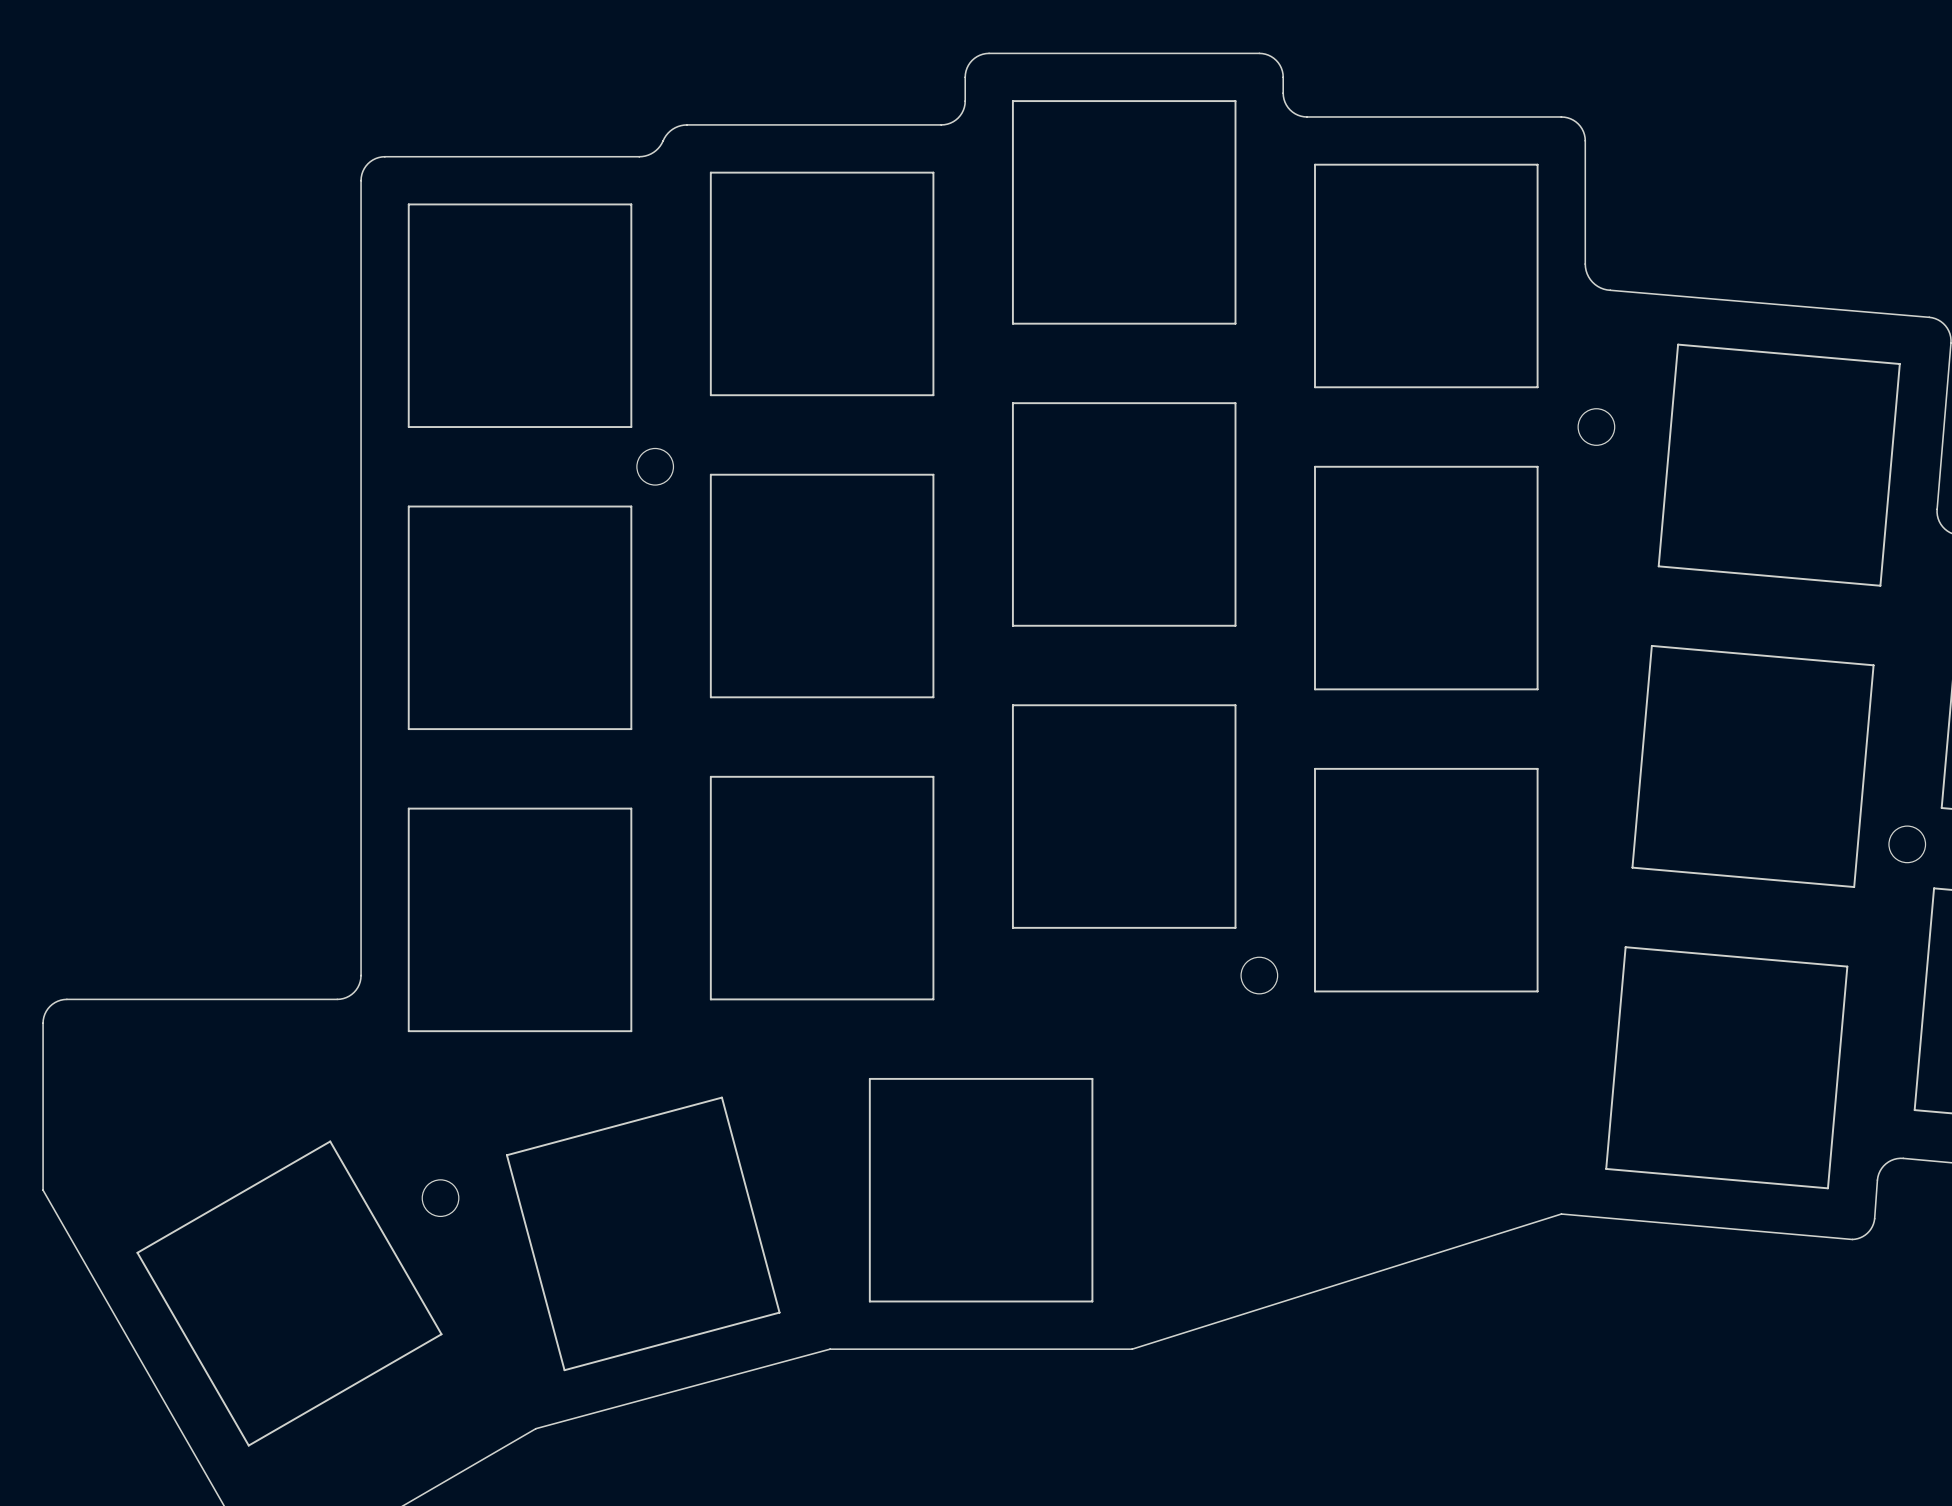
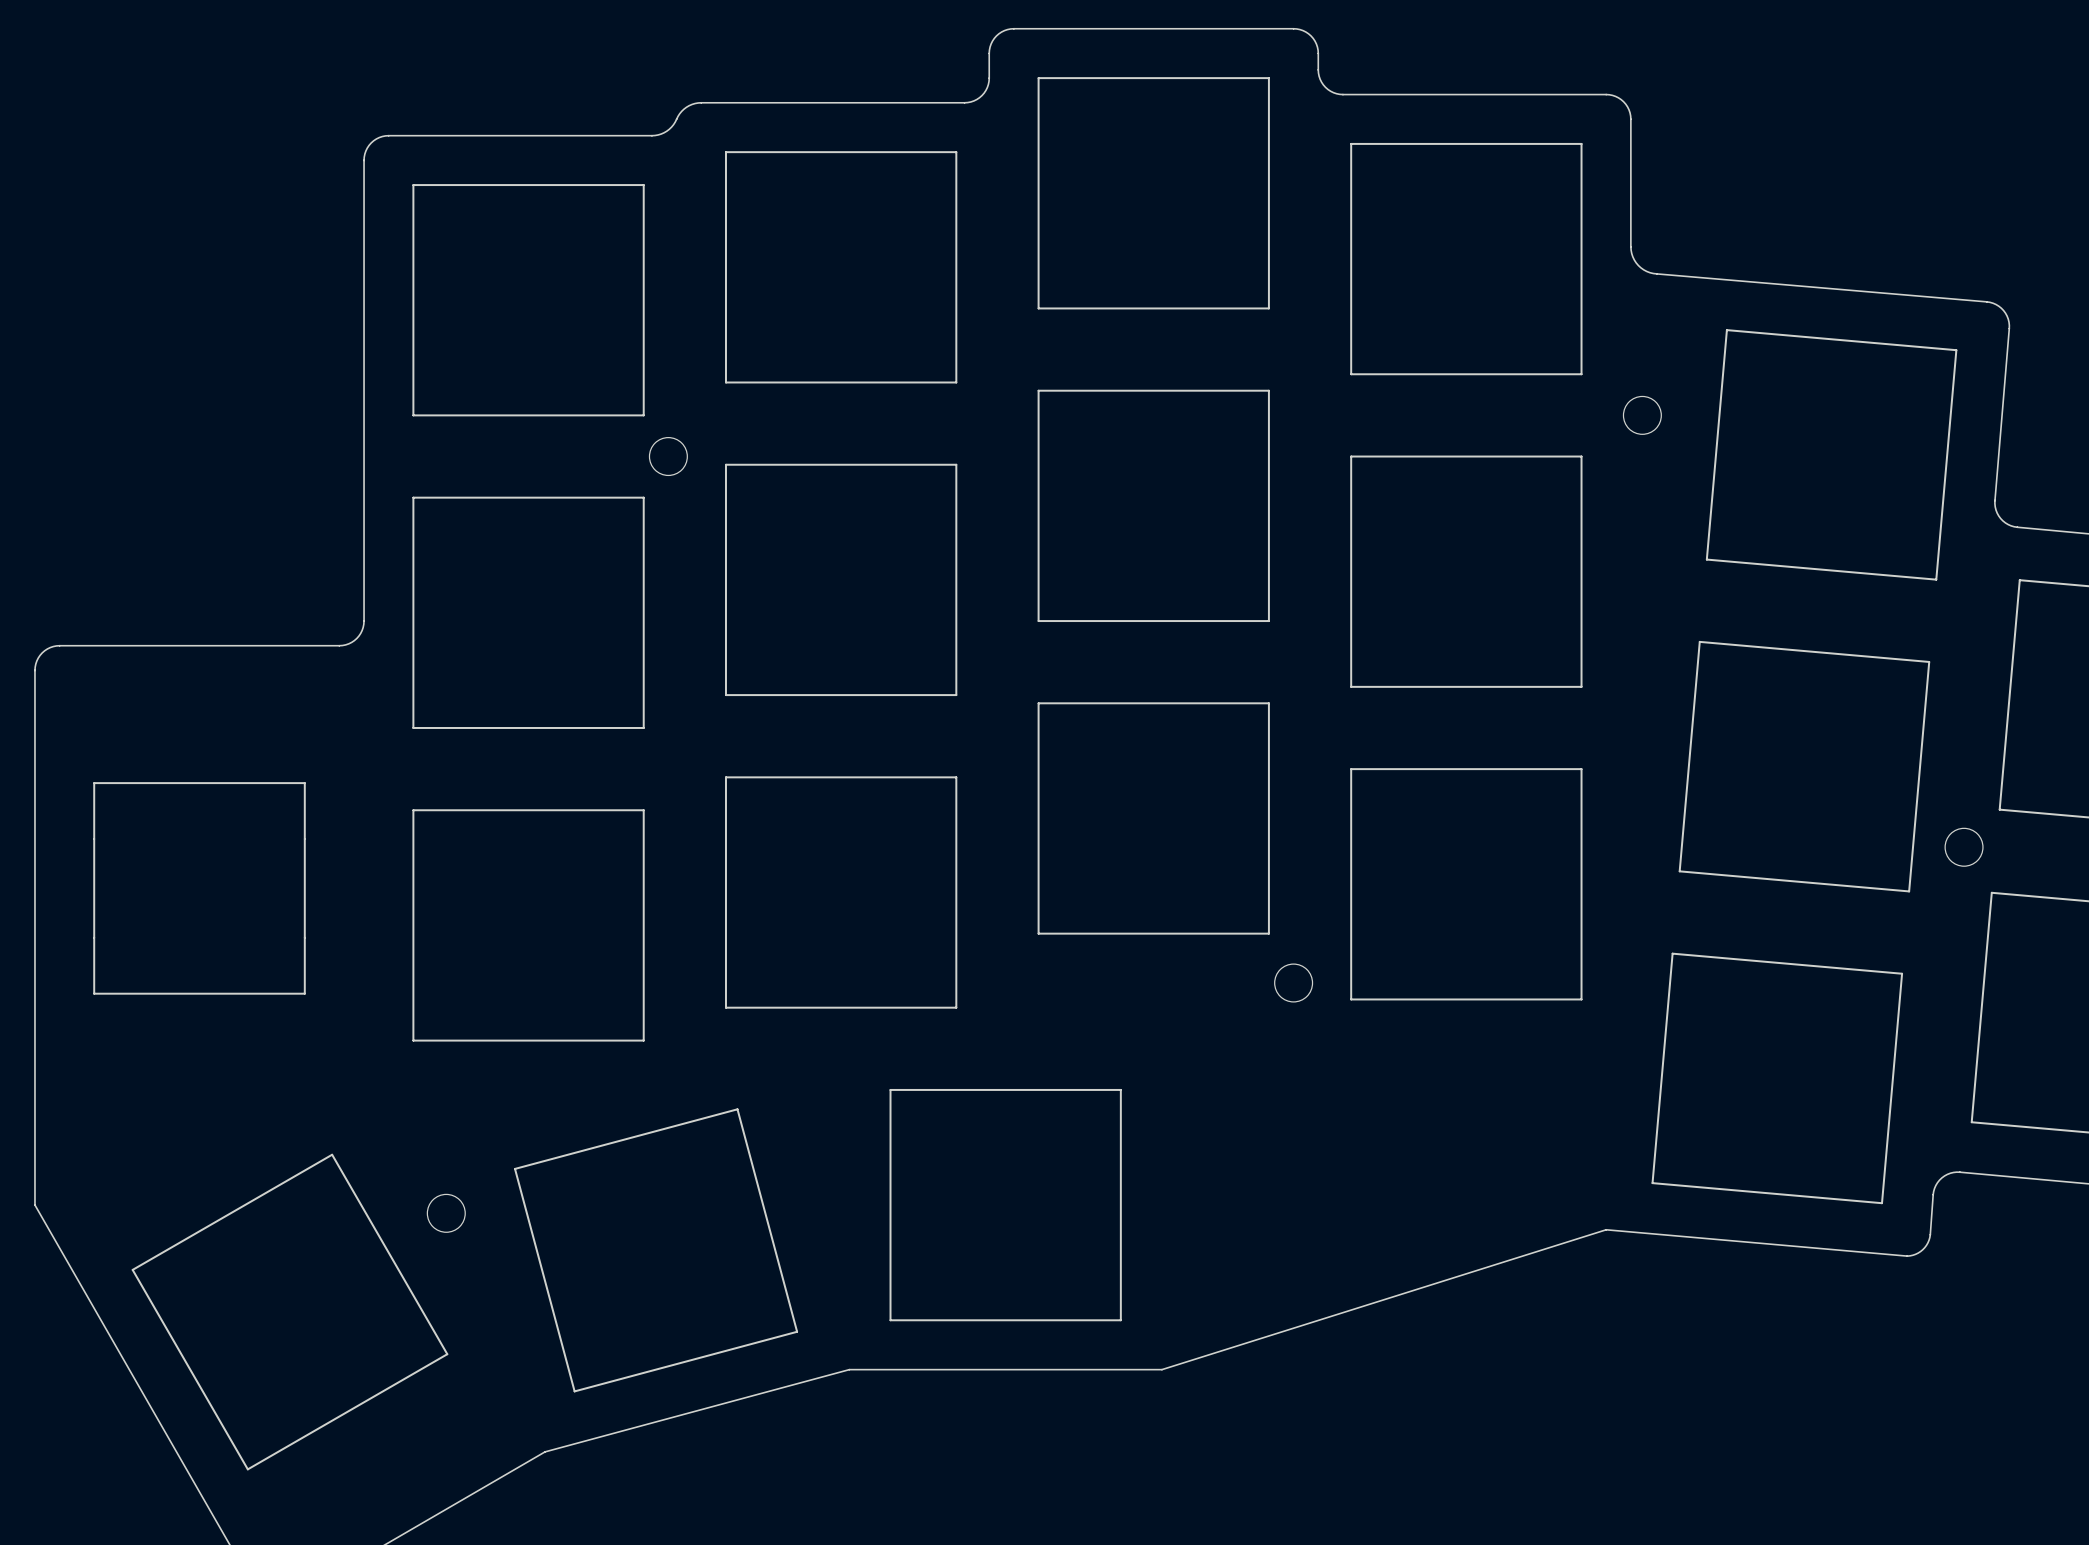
board edge: (361, 625) (361, 975) (356, 990) (349, 996) (337, 999) (63, 999) (50, 1006) (44, 1014) (43, 1023) -> (364, 621) (358, 636) (351, 642) (342, 645) (59, 645) (50, 647) (40, 655) (34, 670) (34, 1032)
drawing: none -> [93, 782, 306, 995]

